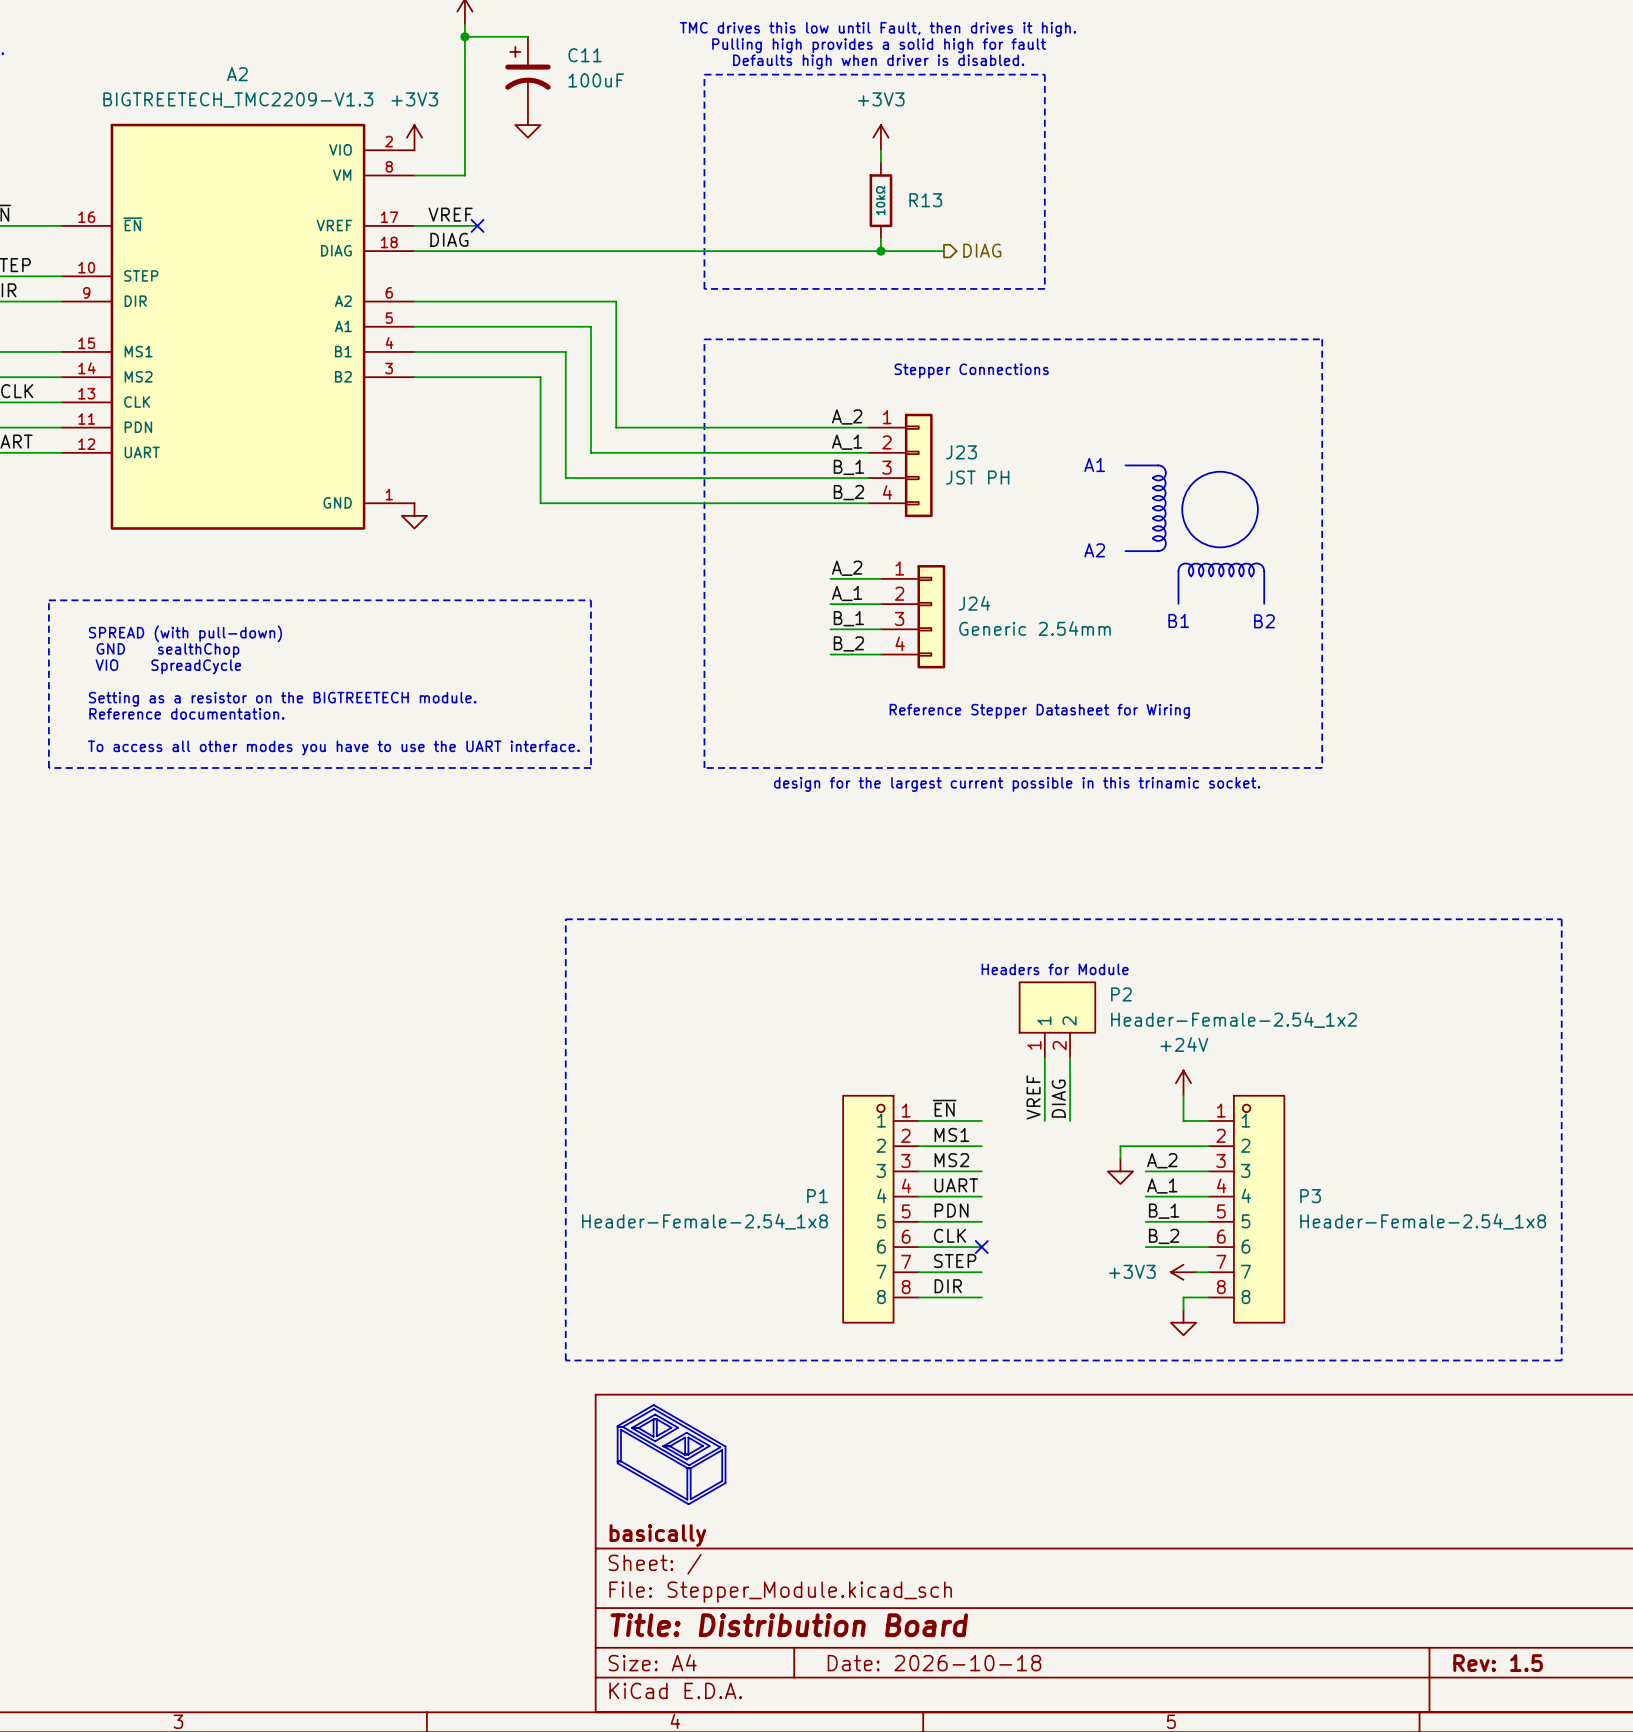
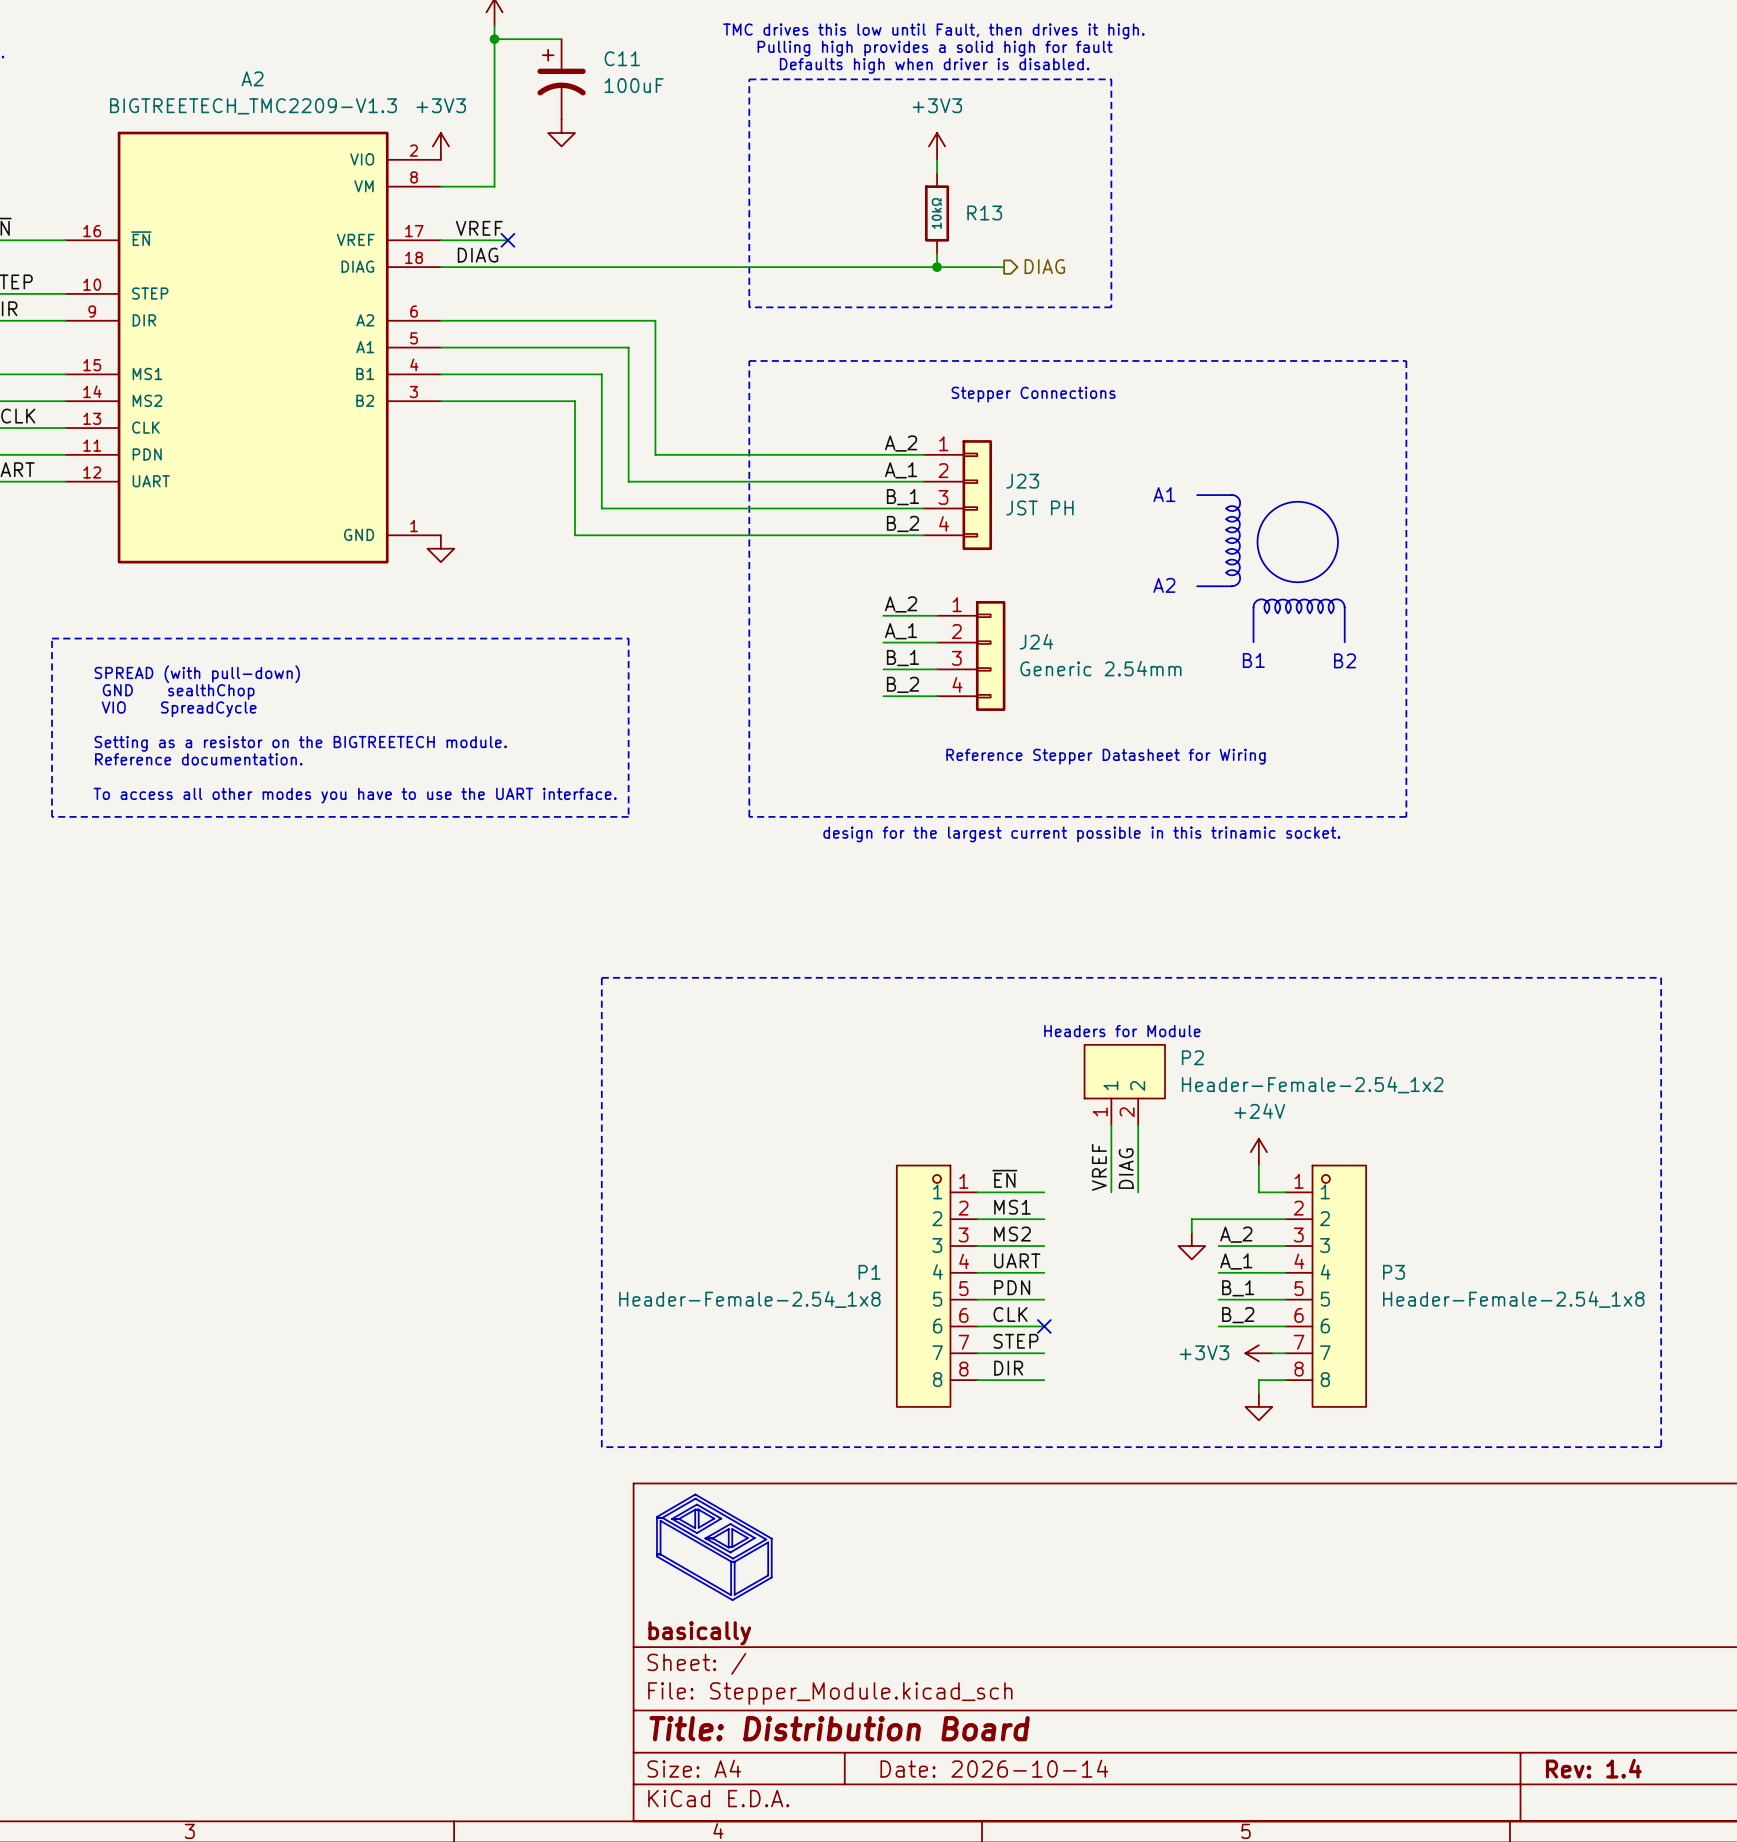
title block: Date: 2026-10-18 (934, 1663) -> Date: 2026-10-14 (994, 1768)
title block: Rev: 1.5 (1498, 1663) -> Rev: 1.4 (1593, 1768)

